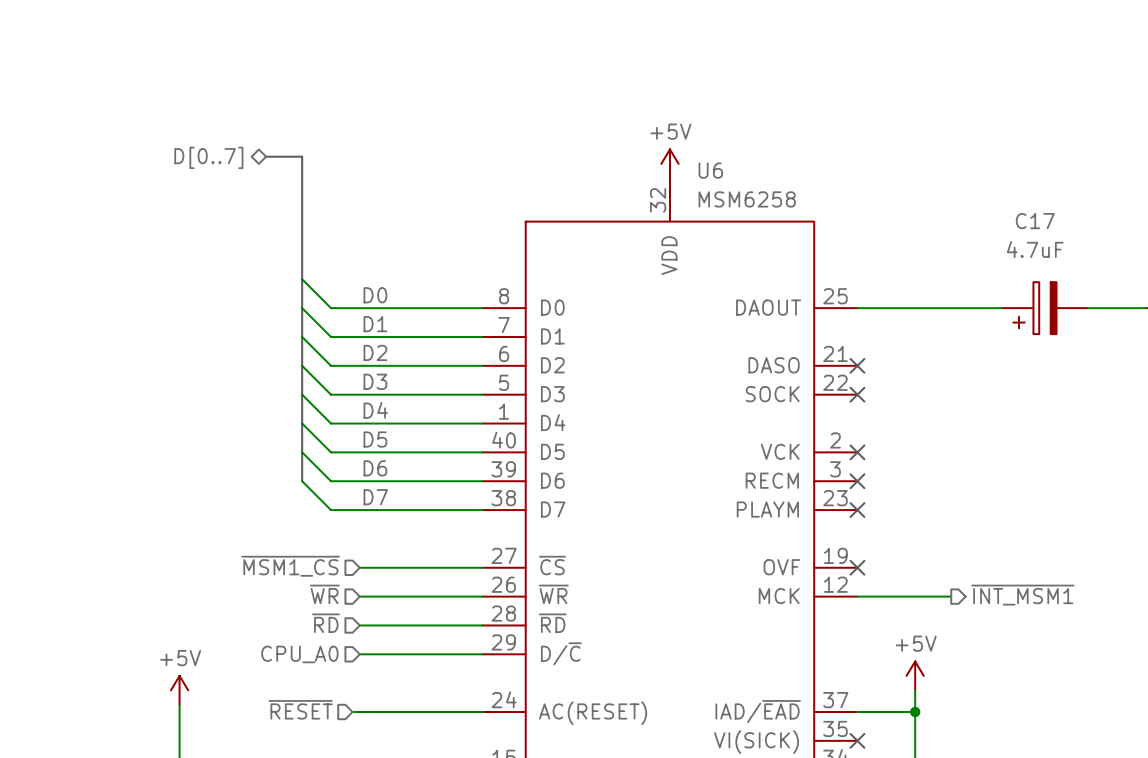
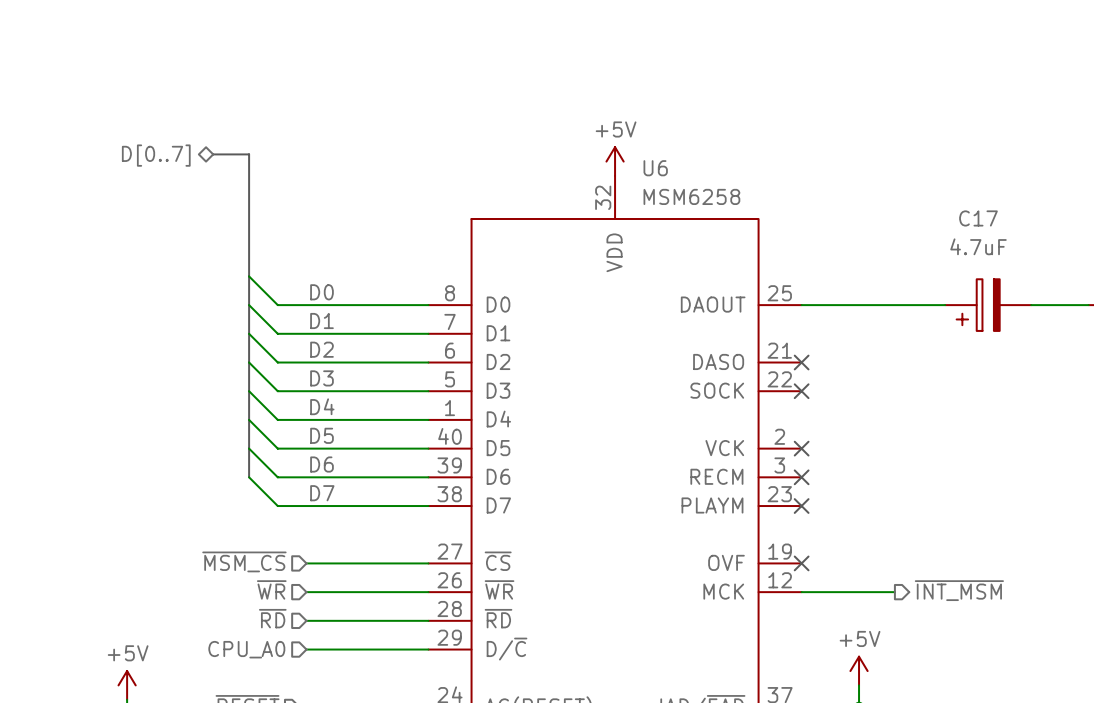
hierarchical label: ~{MSM1_CS} (290, 566) -> ~{MSM_CS} (244, 561)
hierarchical label: ~{INT_MSM1} (1022, 595) -> ~{INT_MSM} (959, 590)

